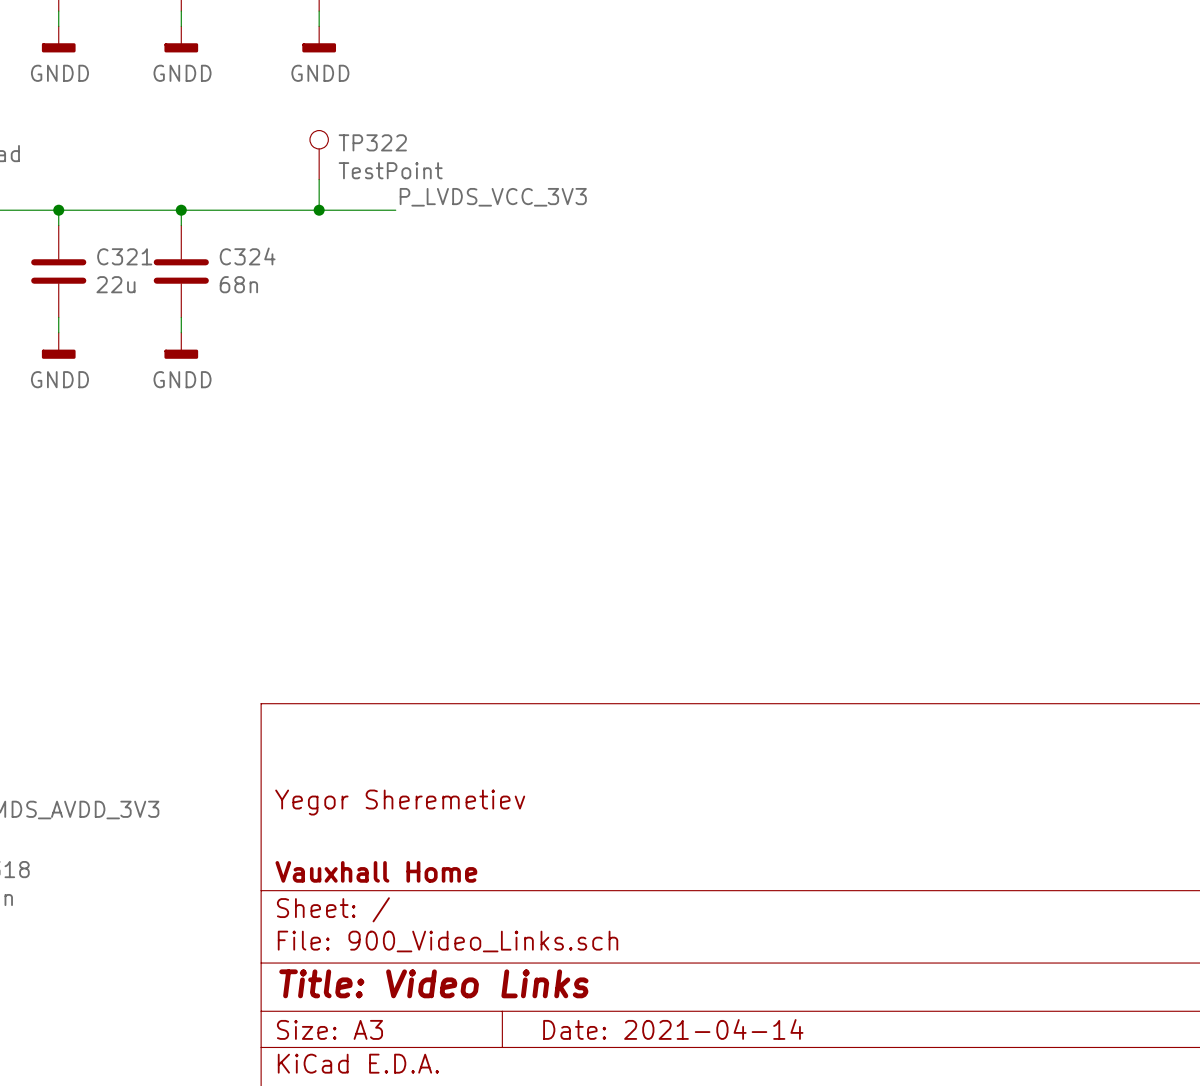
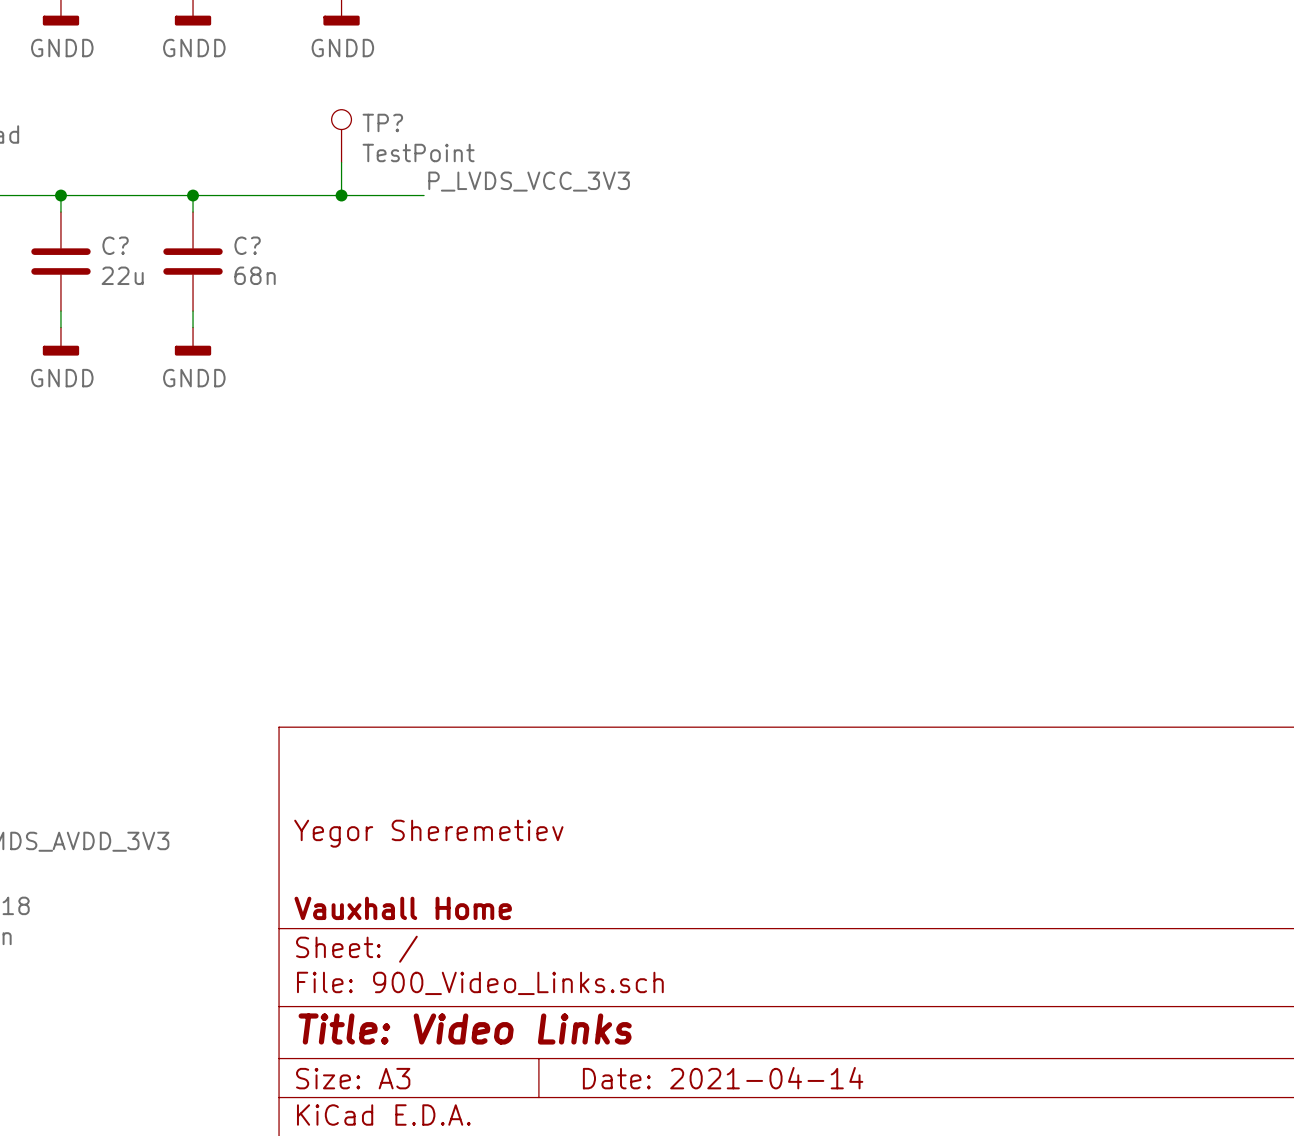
TP322 name: TP322 (372, 142) -> TP? (382, 122)
C321 name: C321 (124, 256) -> C? (115, 245)
C324 name: C324 (247, 256) -> C? (247, 245)

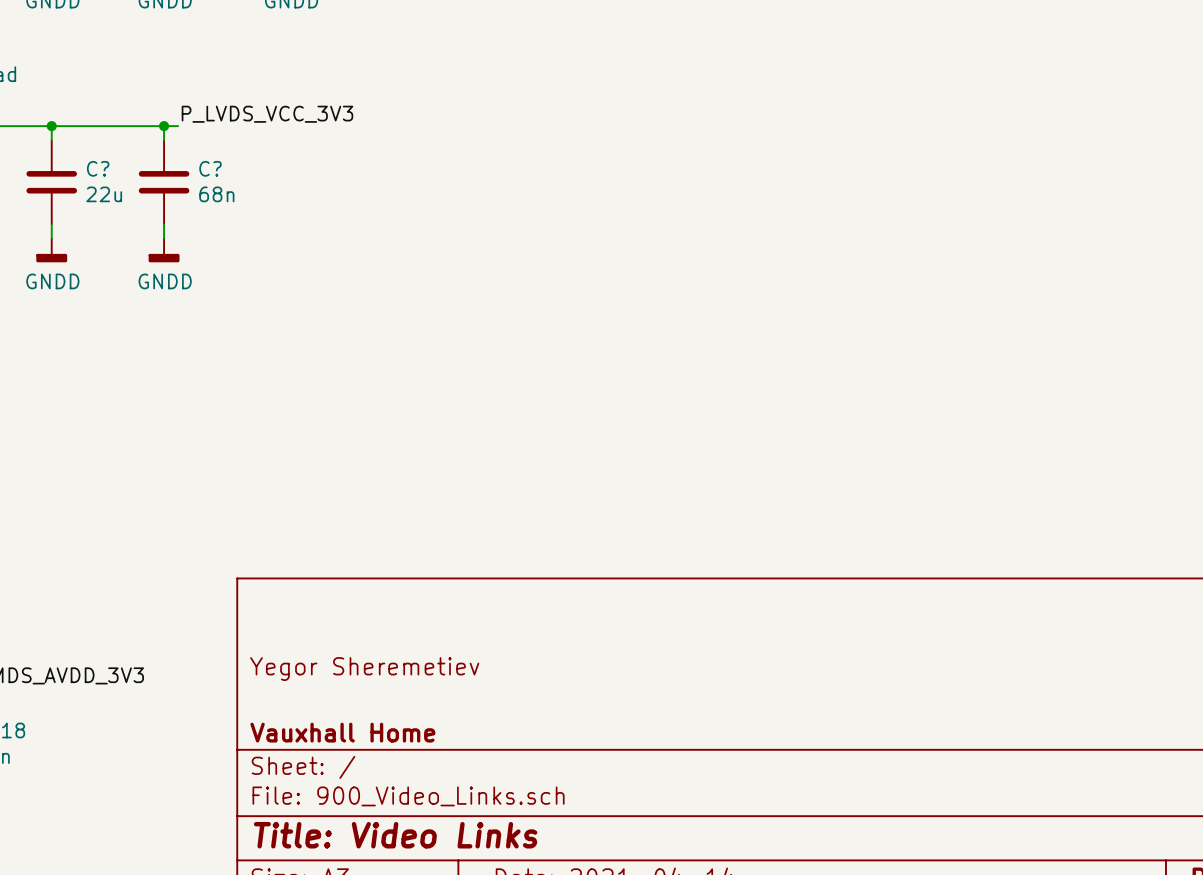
TP?: TestPoint (341, 136) -> none
wire: (341, 162) (341, 195) -> none
label position: P_LVDS_VCC_3V3 (529, 181) -> P_LVDS_VCC_3V3 (267, 114)
wire: (209, 195) (424, 195) -> none
junction: (341, 195) -> none

